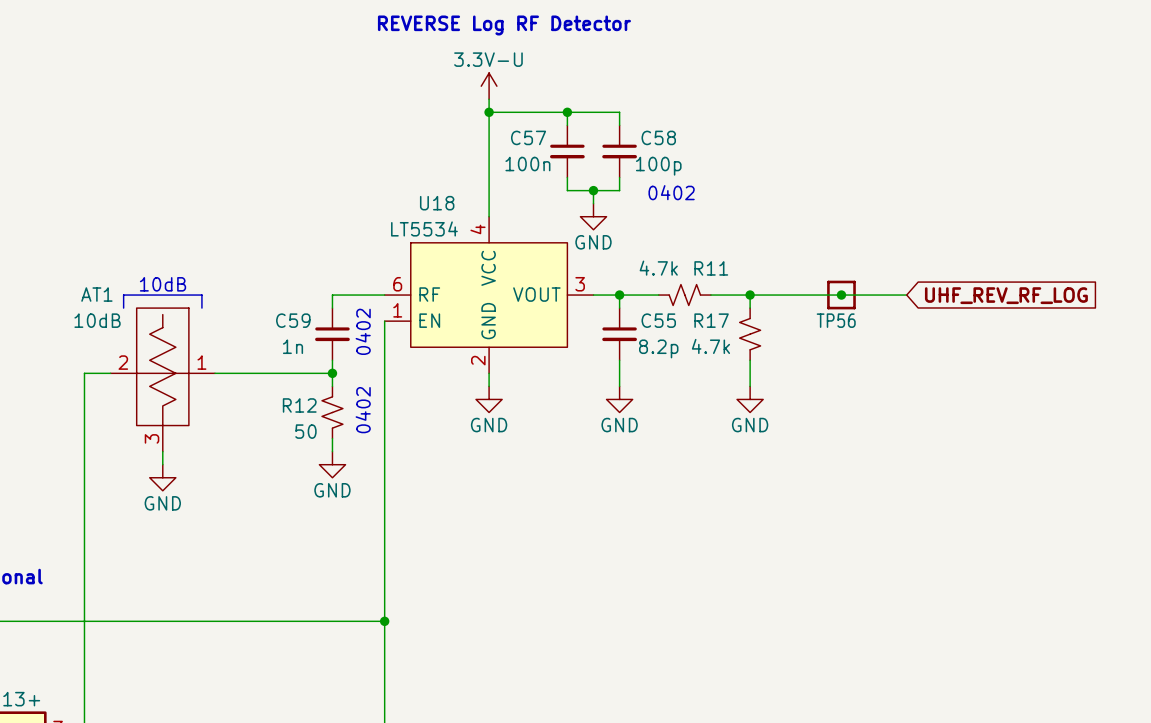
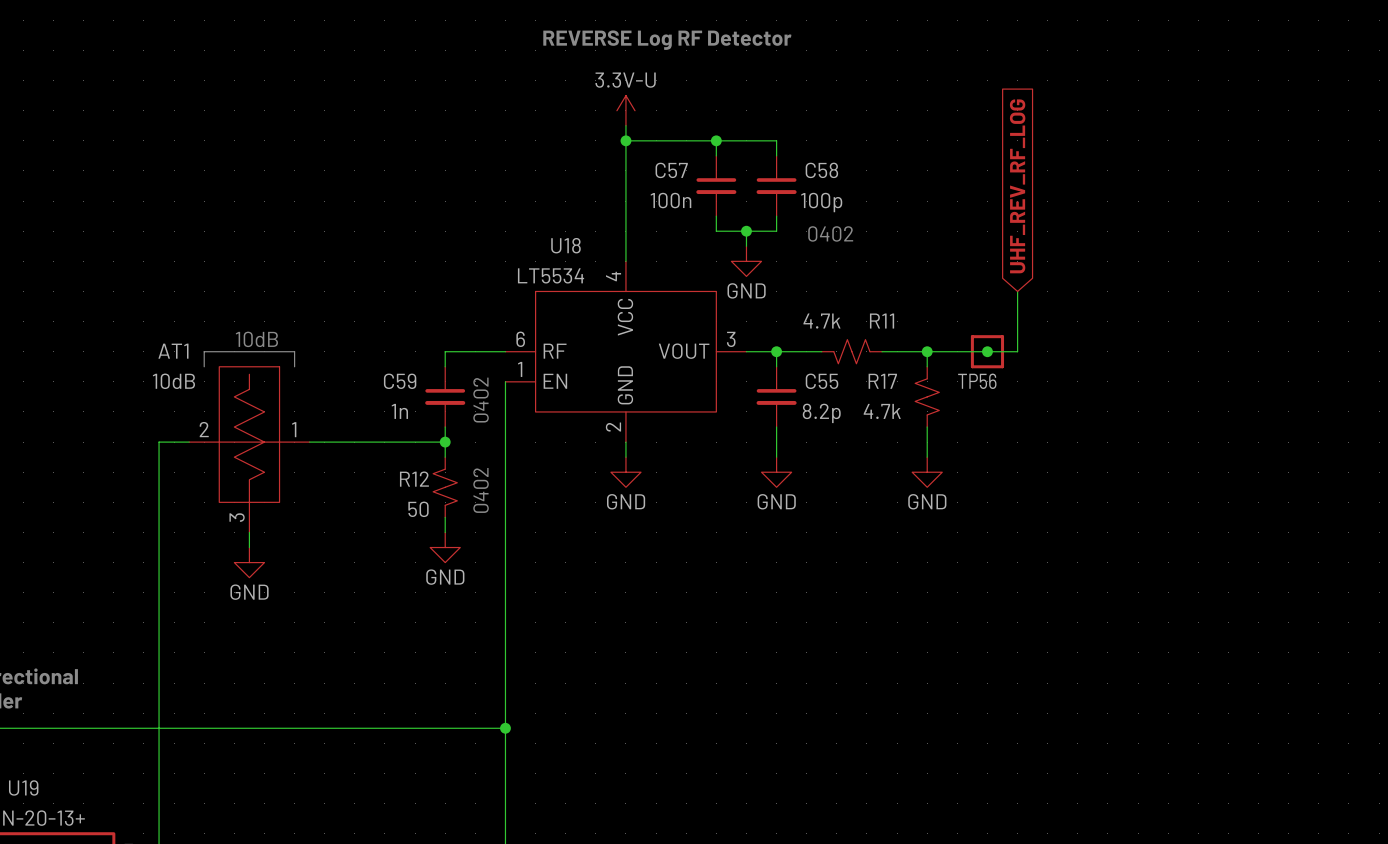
wire: (828, 295) (906, 295) -> (1017, 351) (1017, 291)
junction position: (841, 295) -> (987, 351)
TP56 position: (841, 295) -> (987, 351)
global label rotation: 0° (1006, 295) -> 90° counterclockwise (1017, 186)
global label position: UHF_REV_RF_LOG (1006, 295) -> UHF_REV_RF_LOG (1017, 186)

